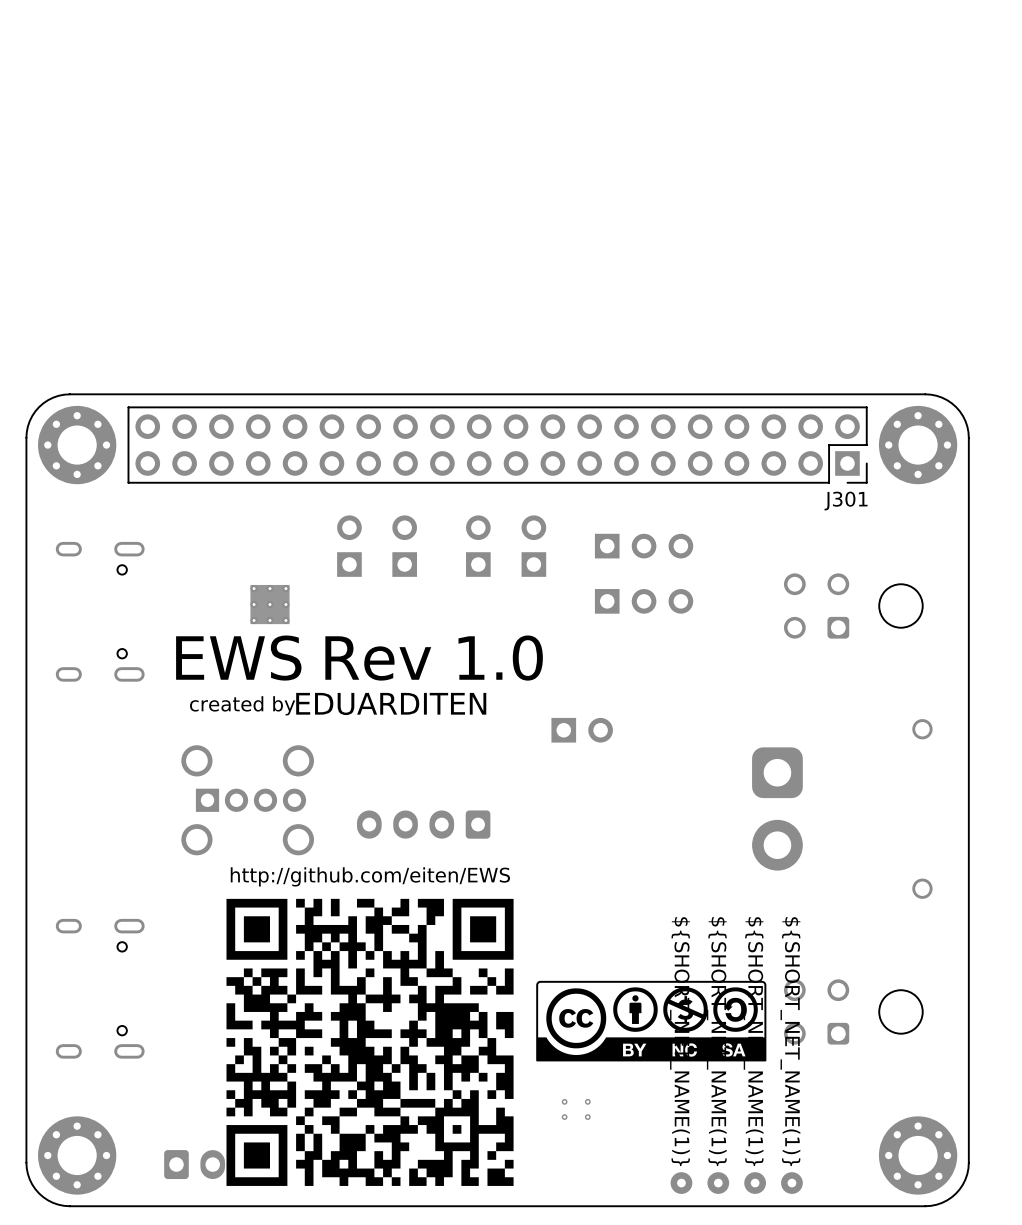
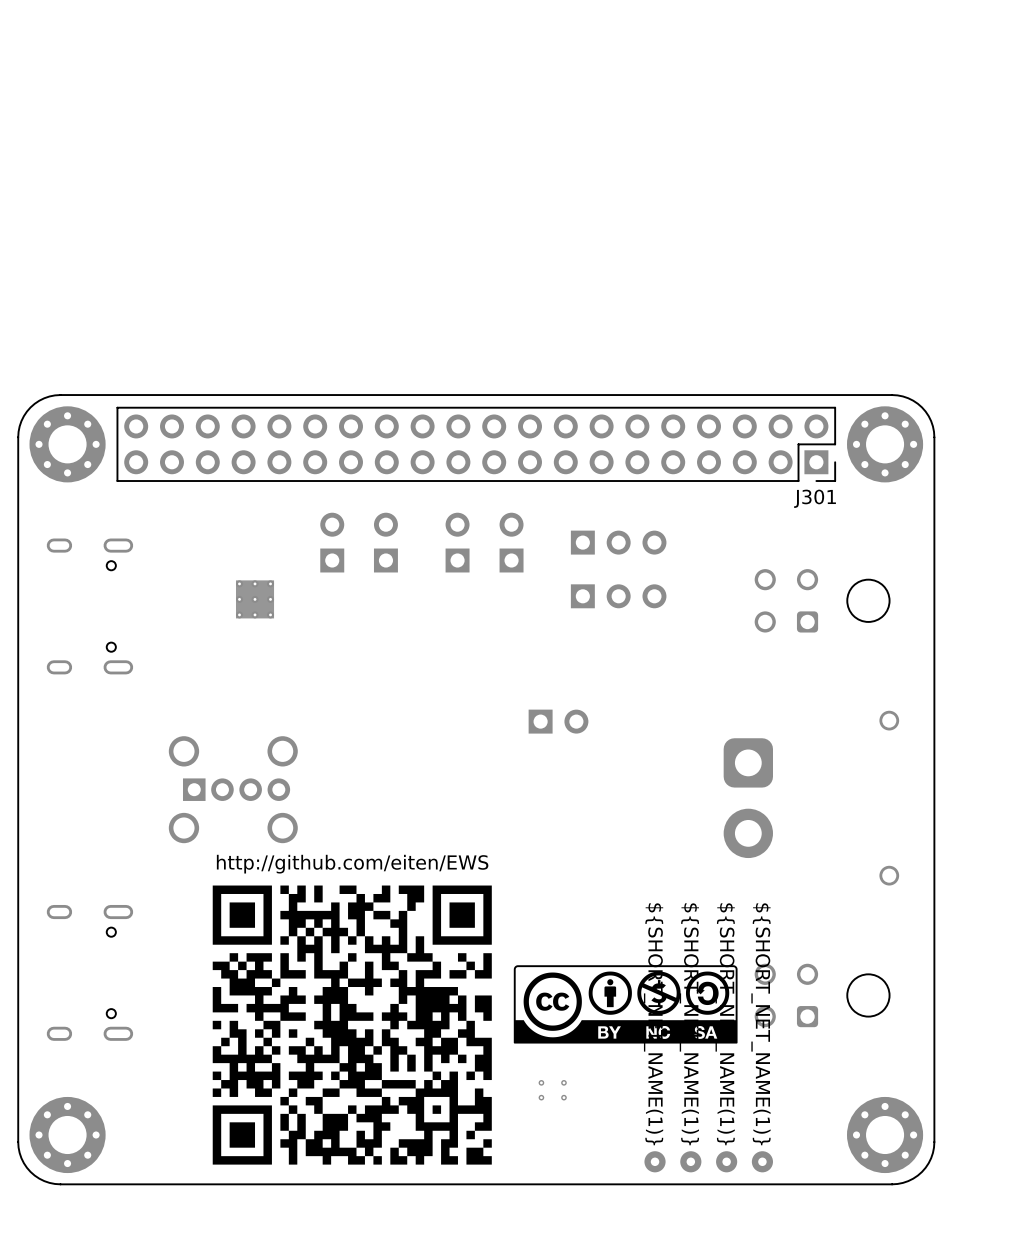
drawing: [176, 635, 543, 716] -> none
part: (423, 824) -> none
part: (194, 1164) -> none

